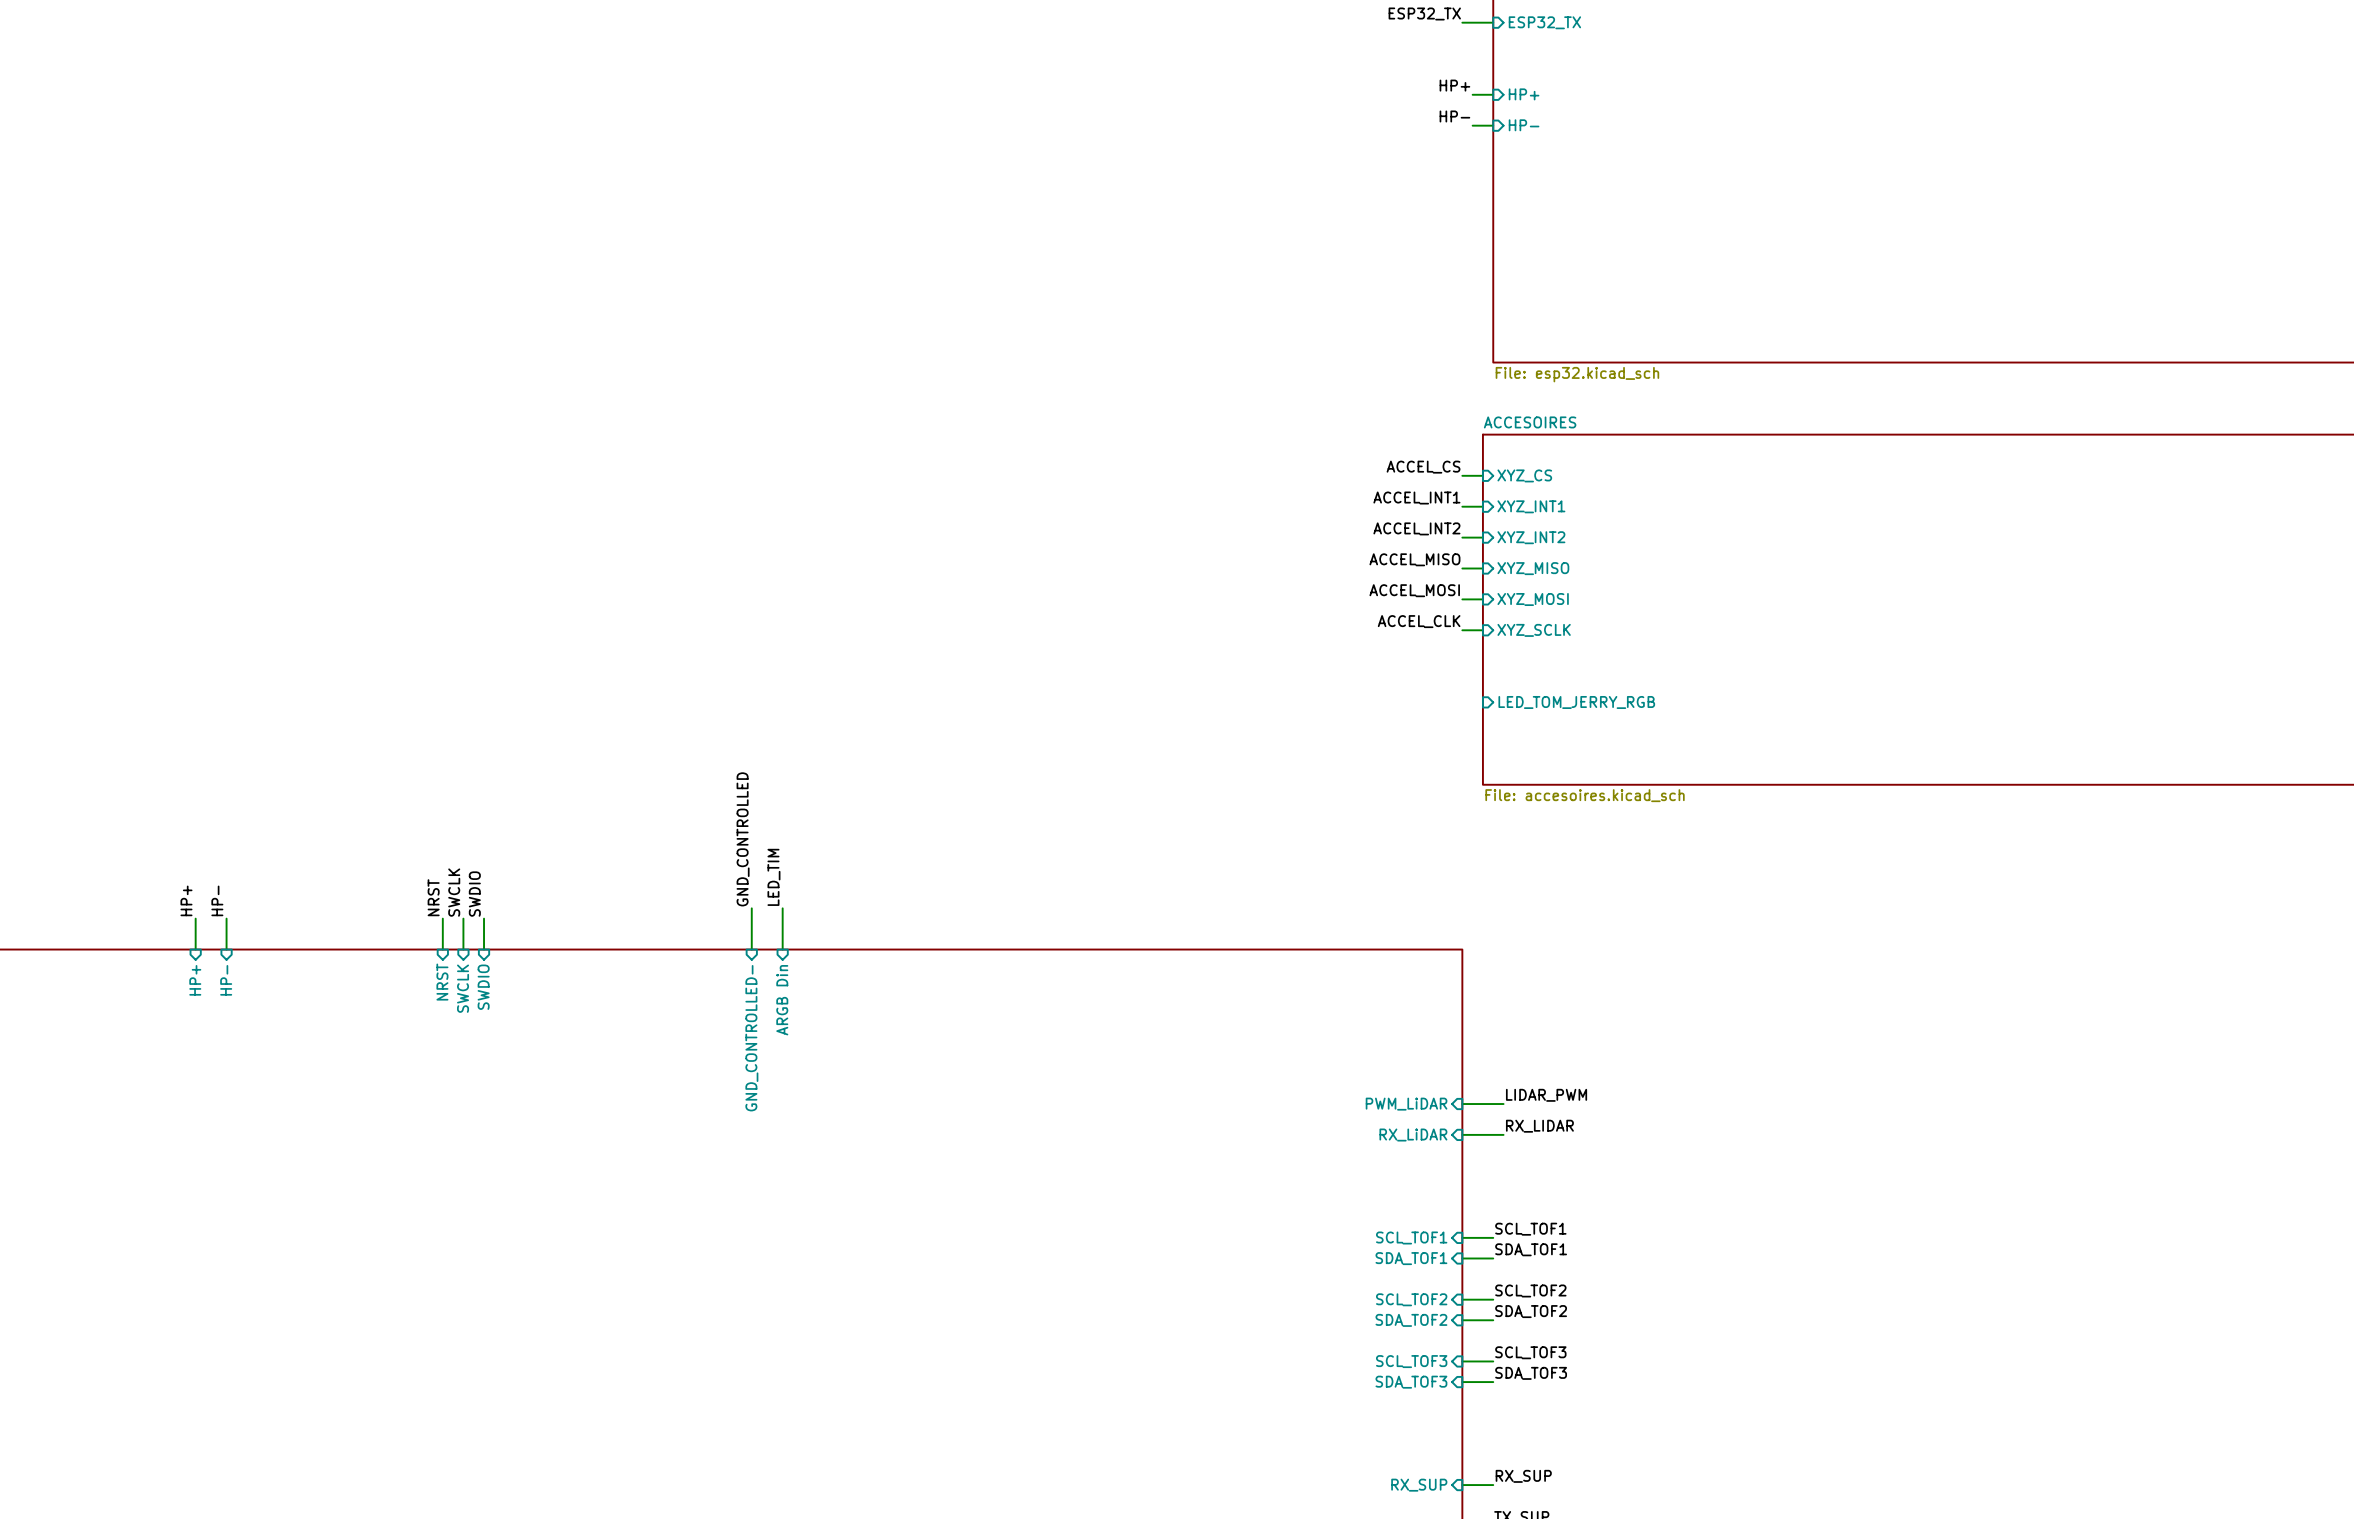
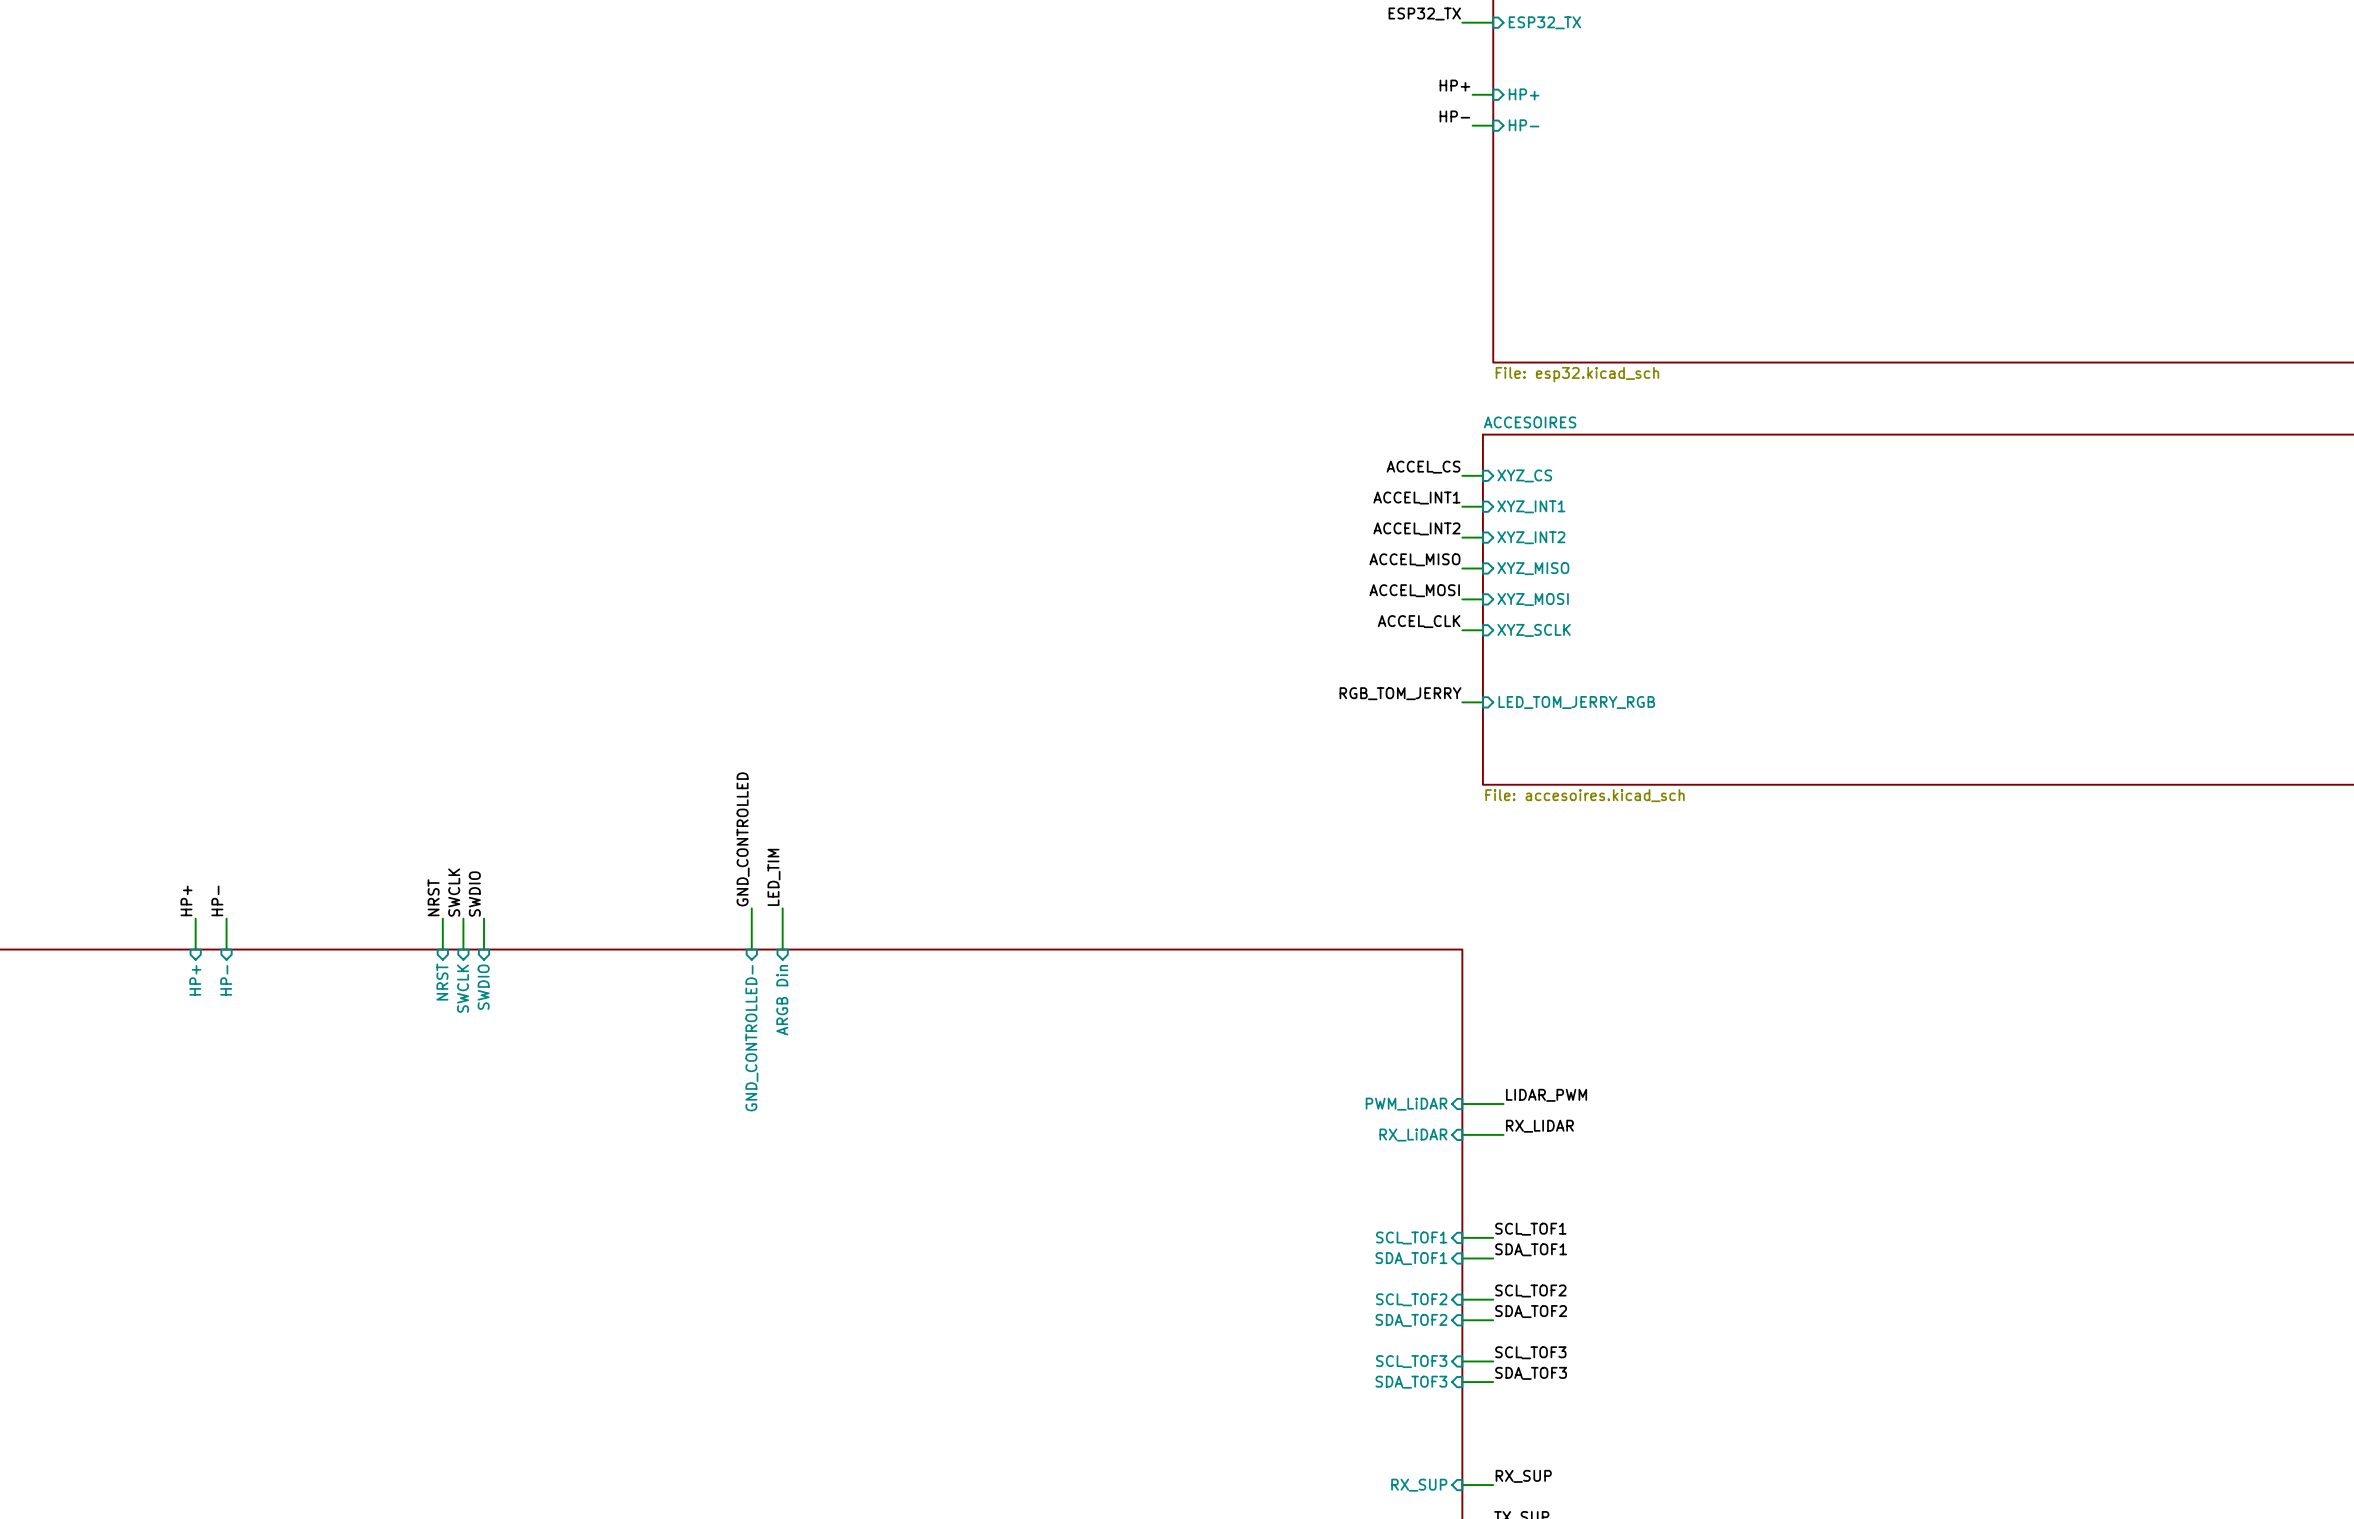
label: none -> RGB_TOM_JERRY (1400, 693)
wire: none -> (1462, 702) (1482, 702)

